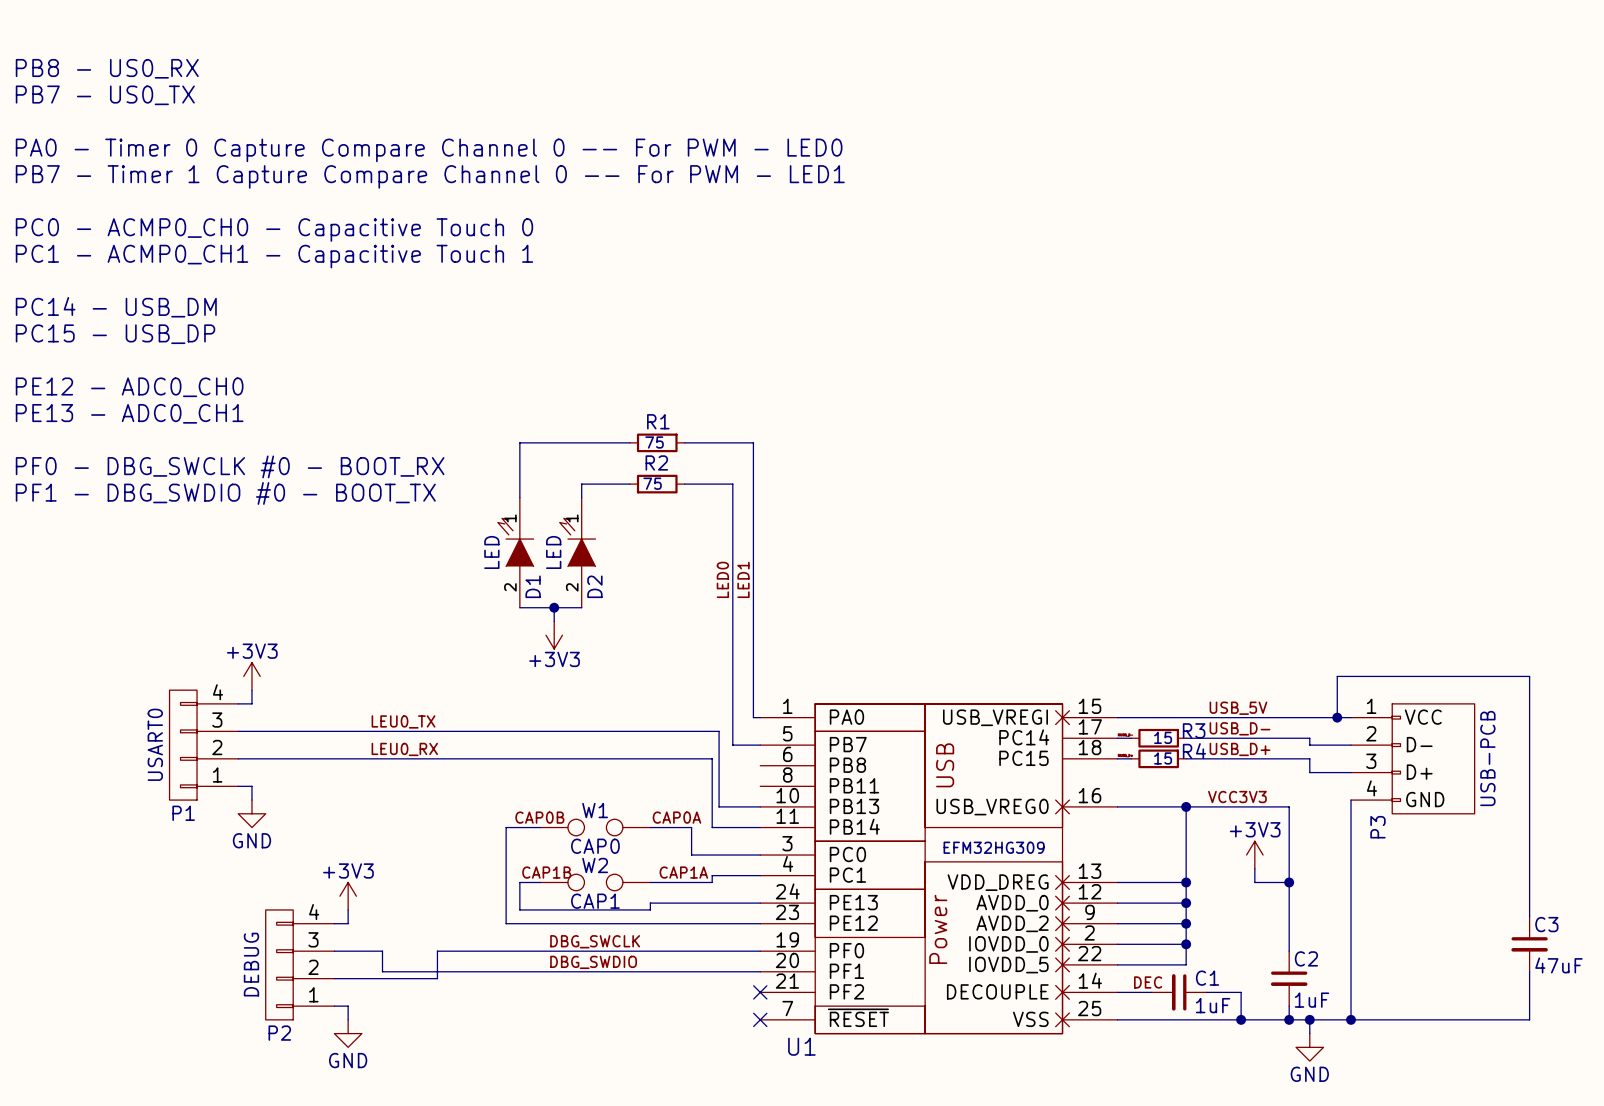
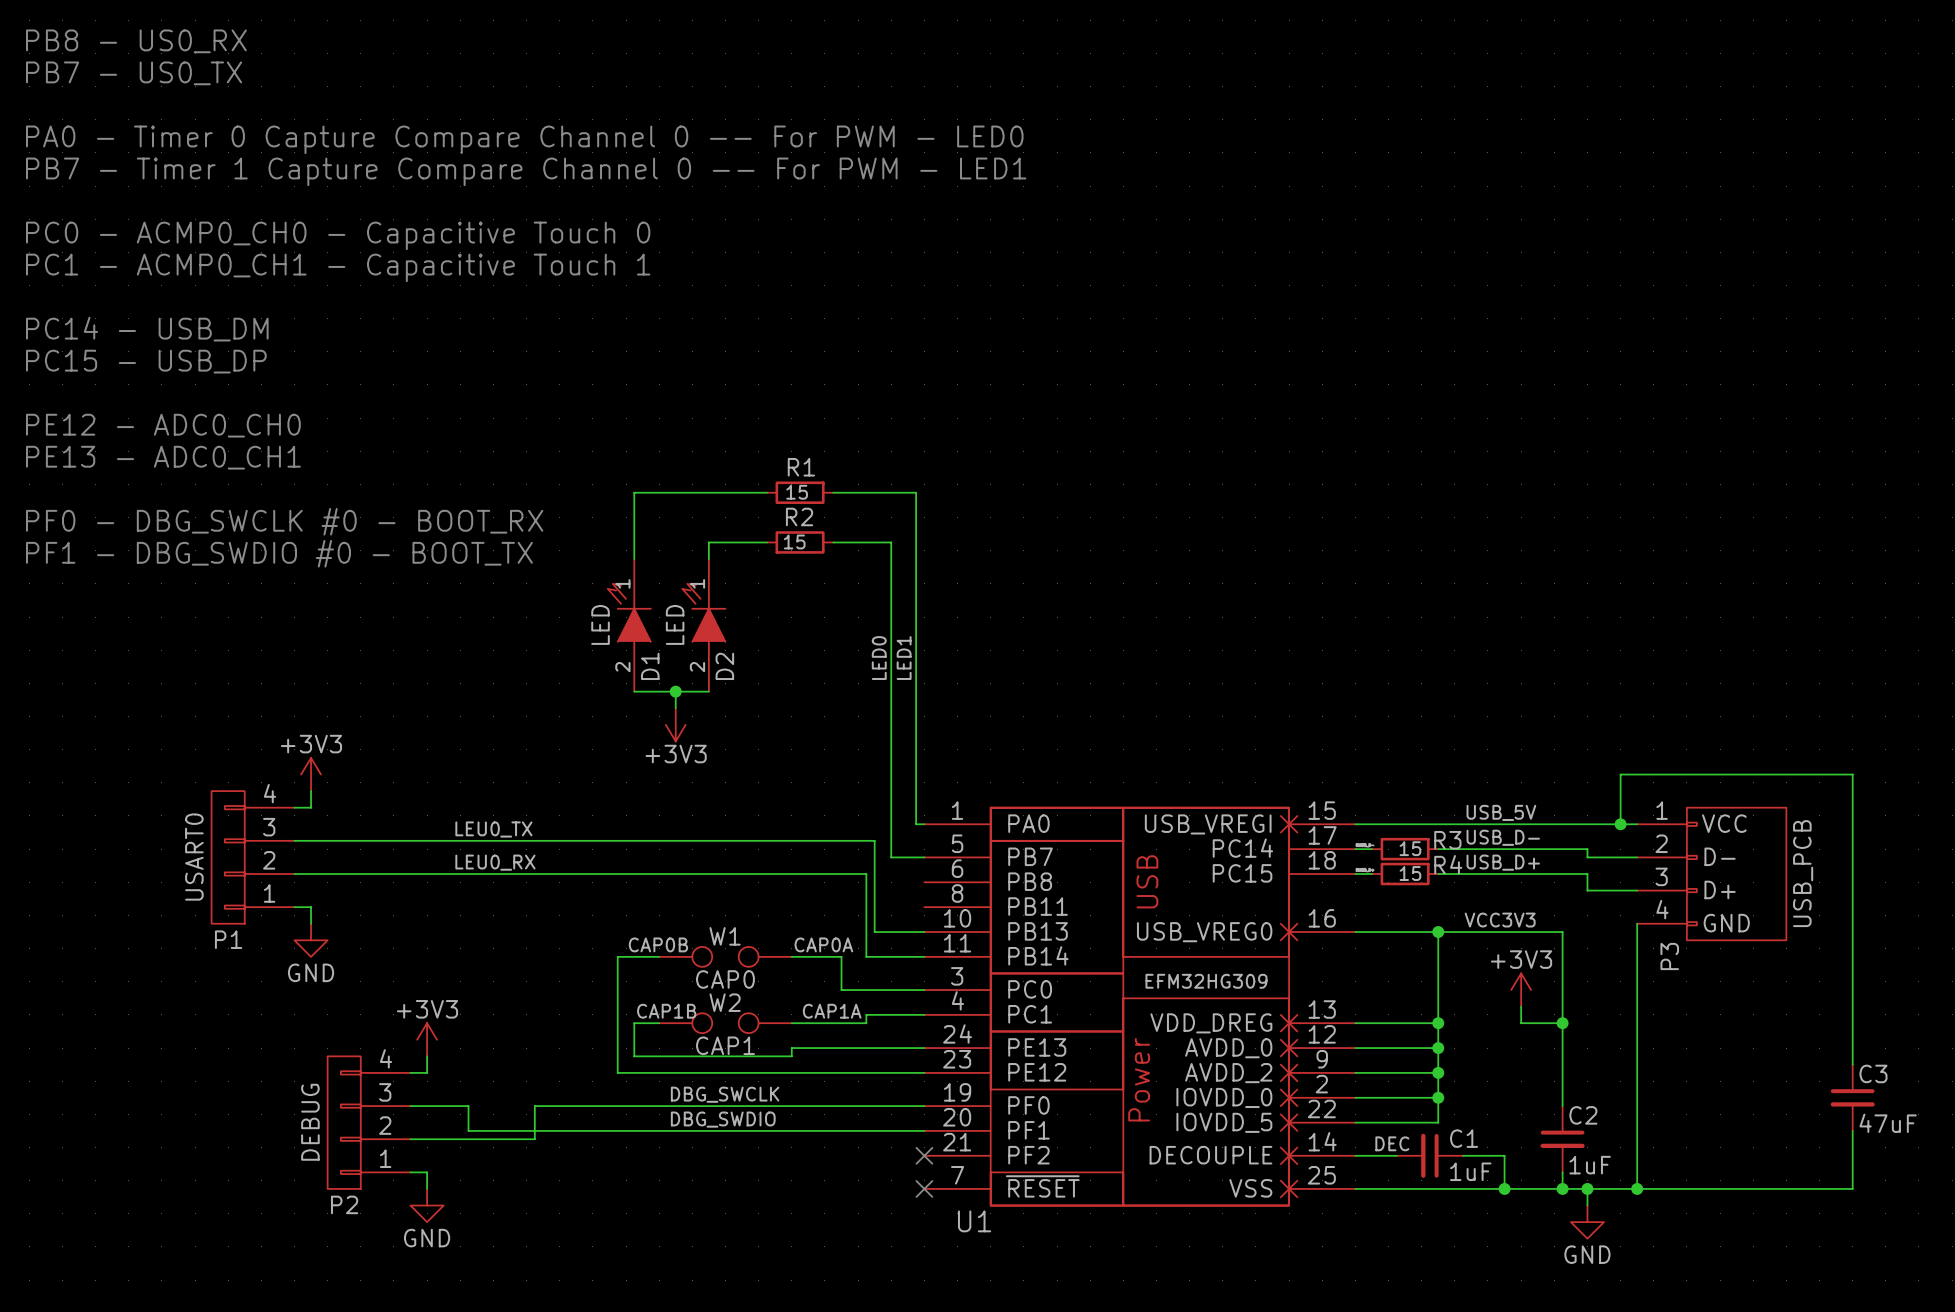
R1 value: 75 (654, 442) -> 15 (797, 492)
R2 value: 75 (652, 483) -> 15 (794, 541)
P3 value: USB-PCB (1487, 758) -> USB_PCB (1803, 873)

